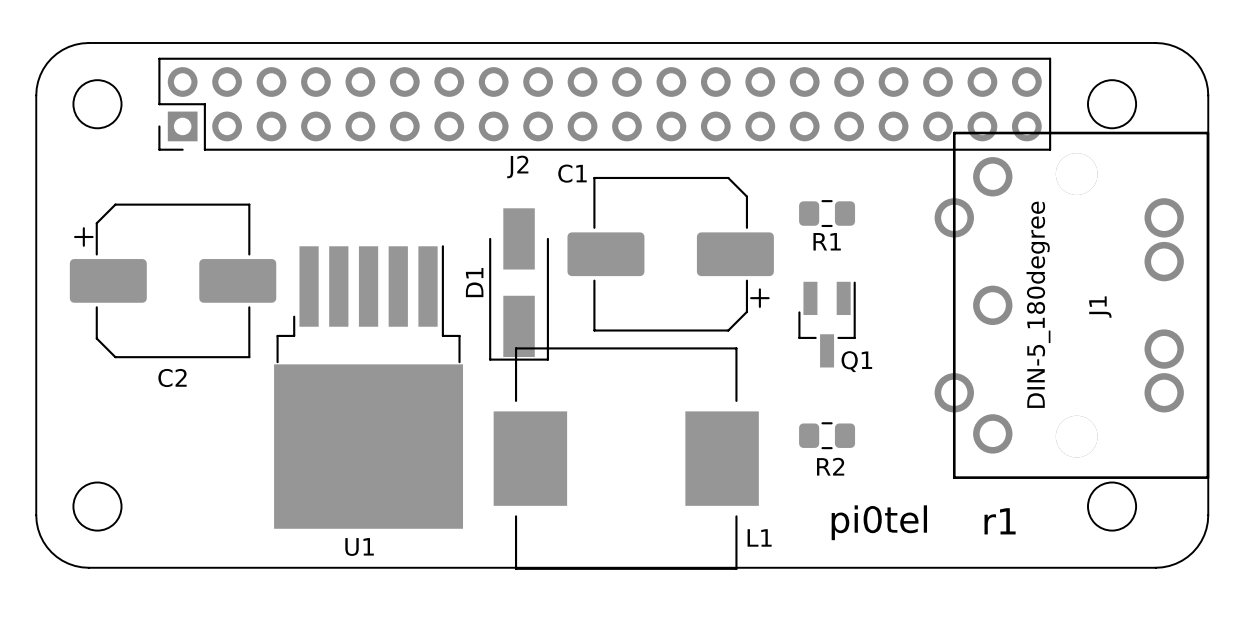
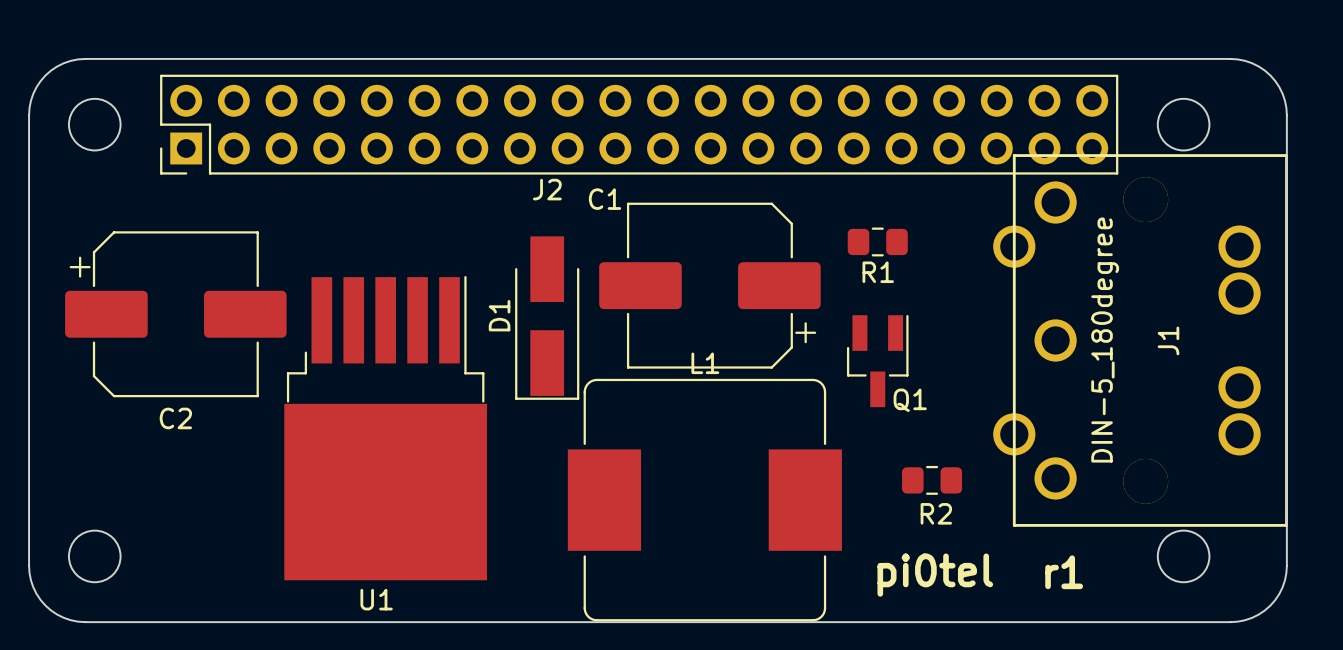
L1 footprint: [493, 347, 759, 570] -> [567, 378, 842, 622]
R2 position: (827, 435) -> (932, 480)
L1 name position: L1 (759, 537) -> L1 (705, 363)

